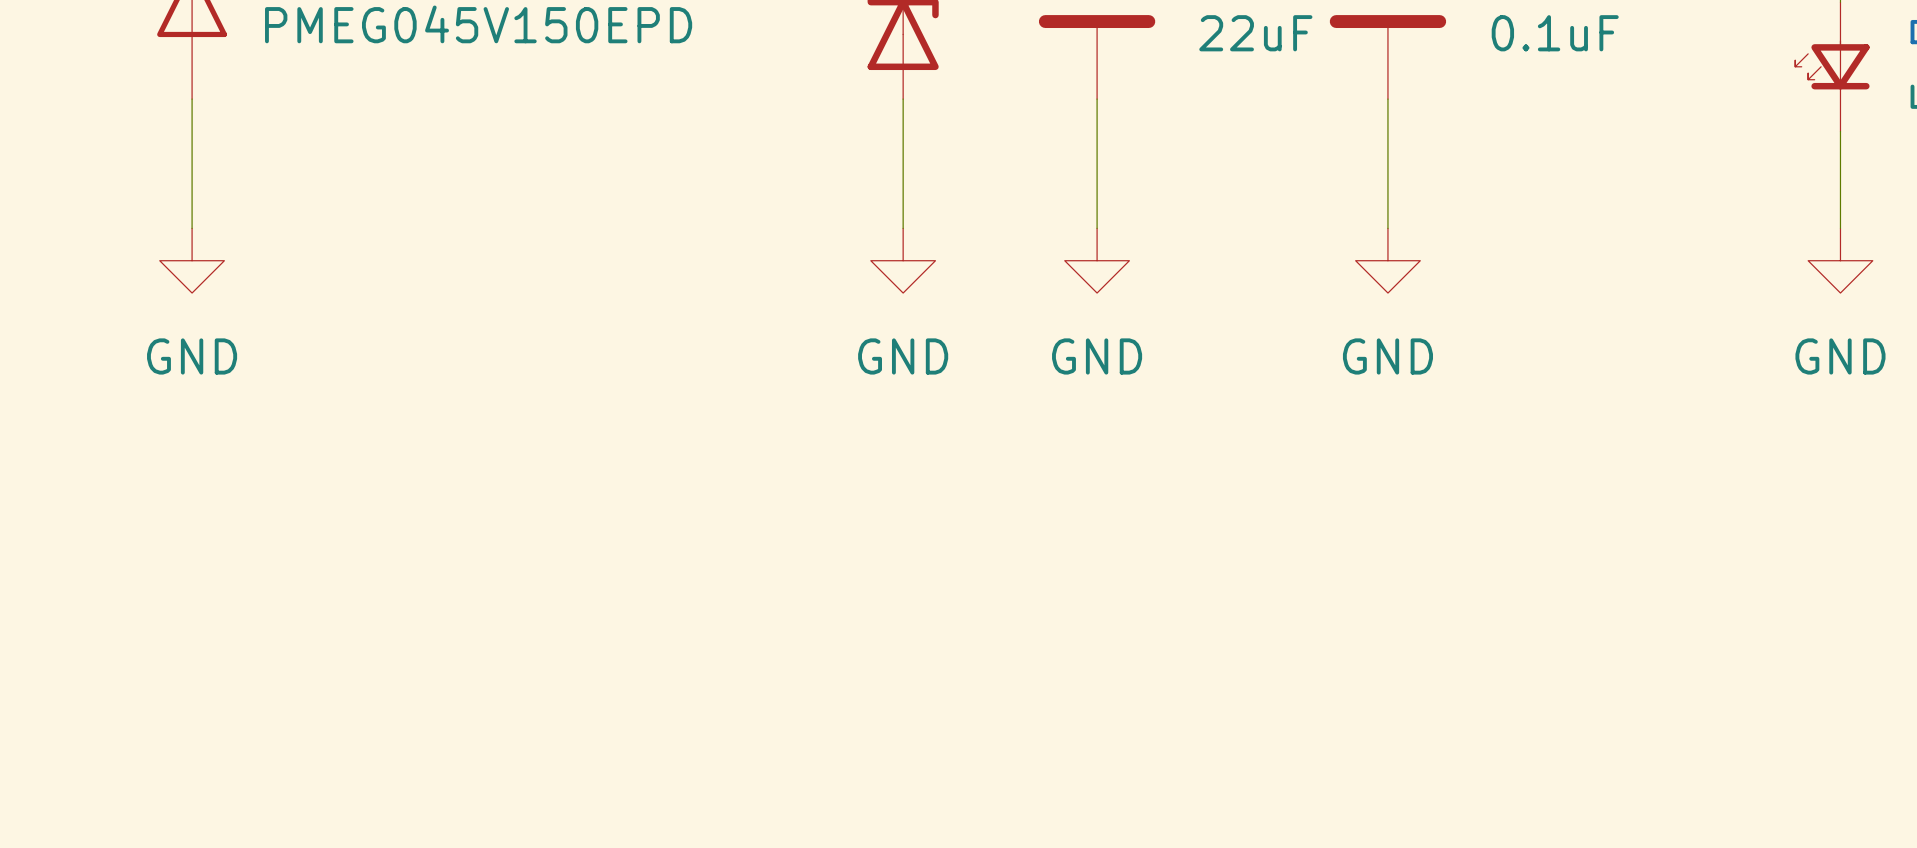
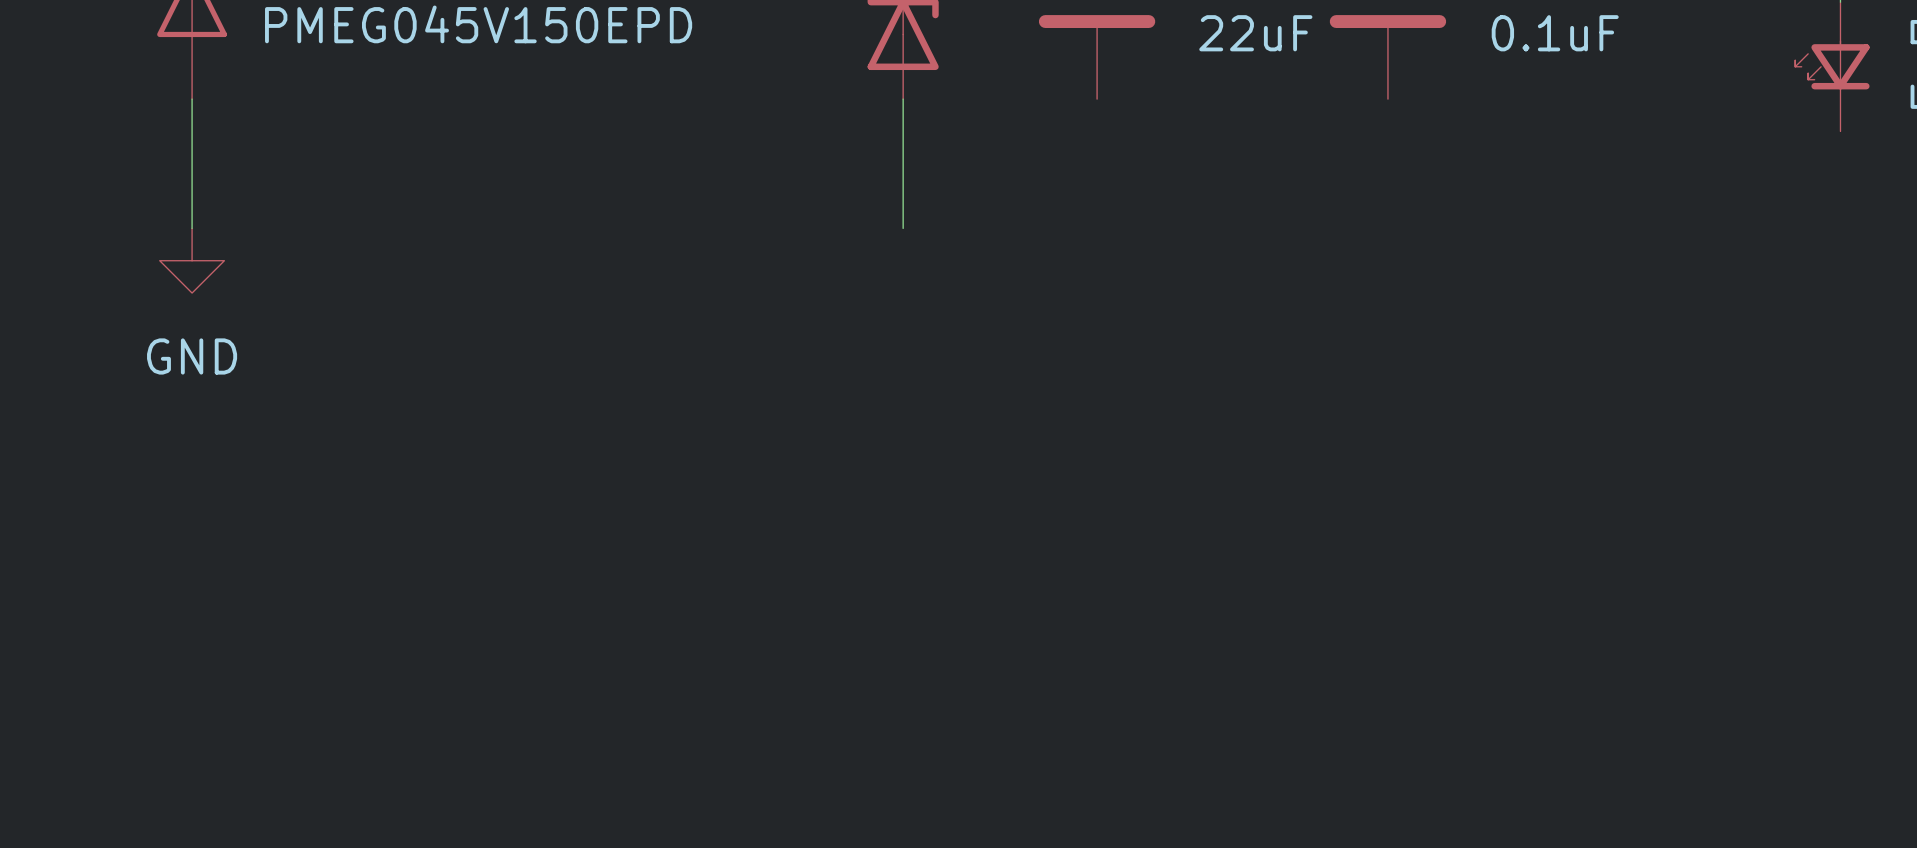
wire: (1097, 99) (1097, 228) -> none
wire: (1387, 99) (1387, 228) -> none
wire: (1840, 131) (1840, 228) -> none
power symbol: GND (903, 260) -> none
power symbol: GND (1097, 260) -> none
power symbol: GND (1387, 260) -> none
power symbol: GND (1840, 260) -> none

